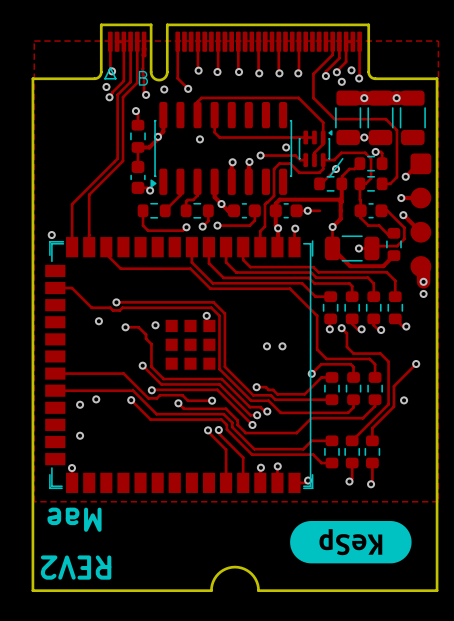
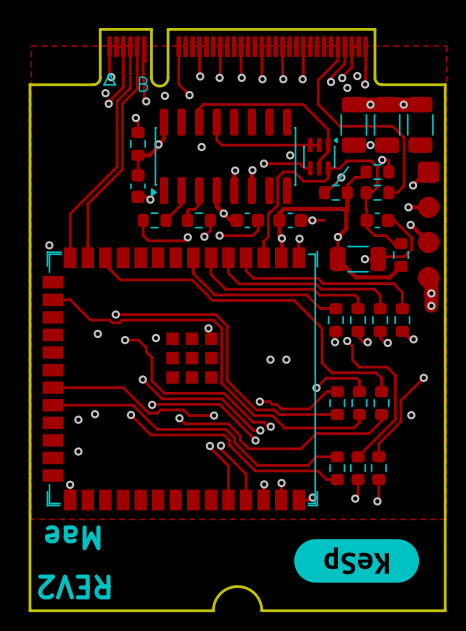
track: none -> (431, 293) (431, 305)

